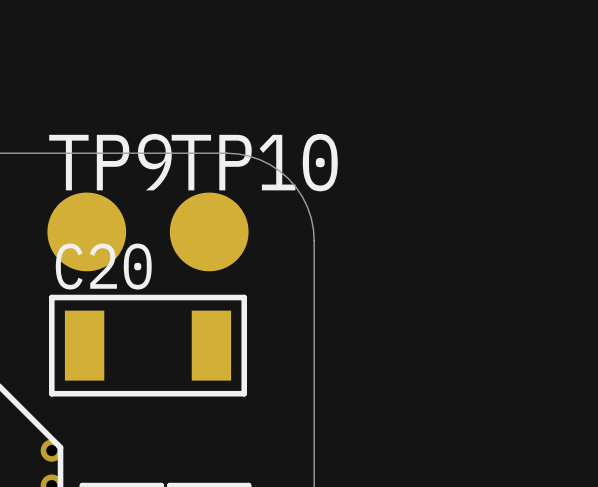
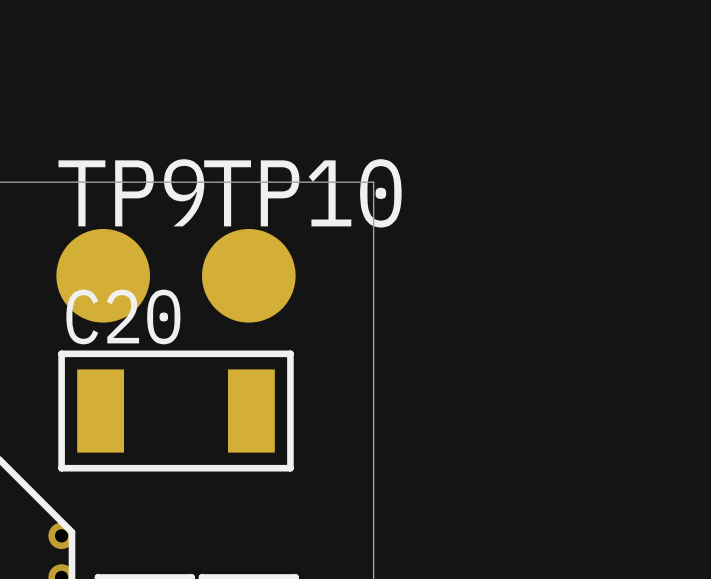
board edge: (226, 153) (260, 159) (288, 178) (307, 207) (314, 240) -> (269, 182) (373, 182) (373, 286)

